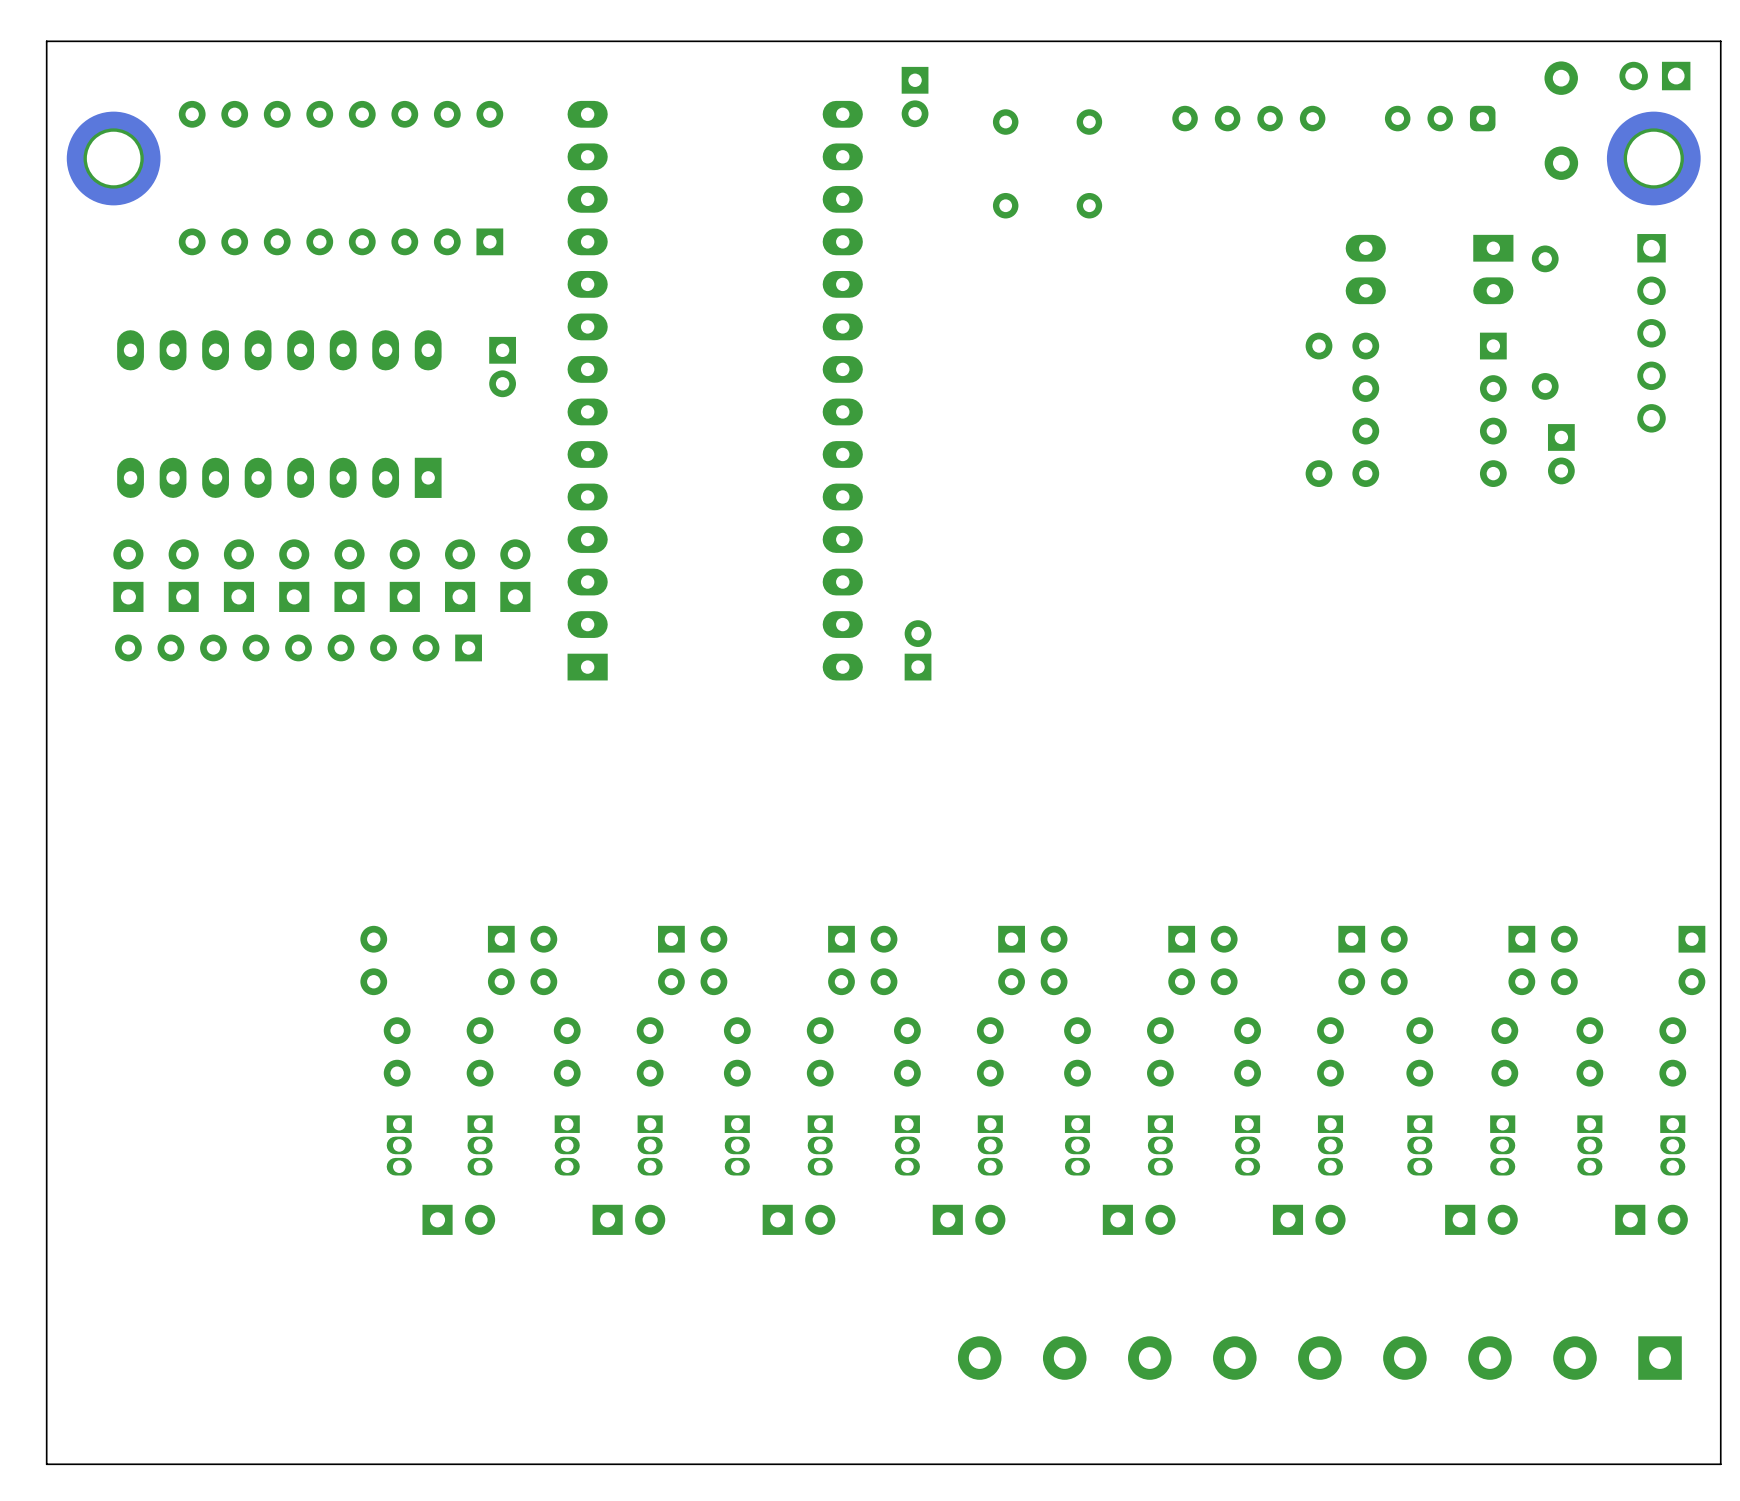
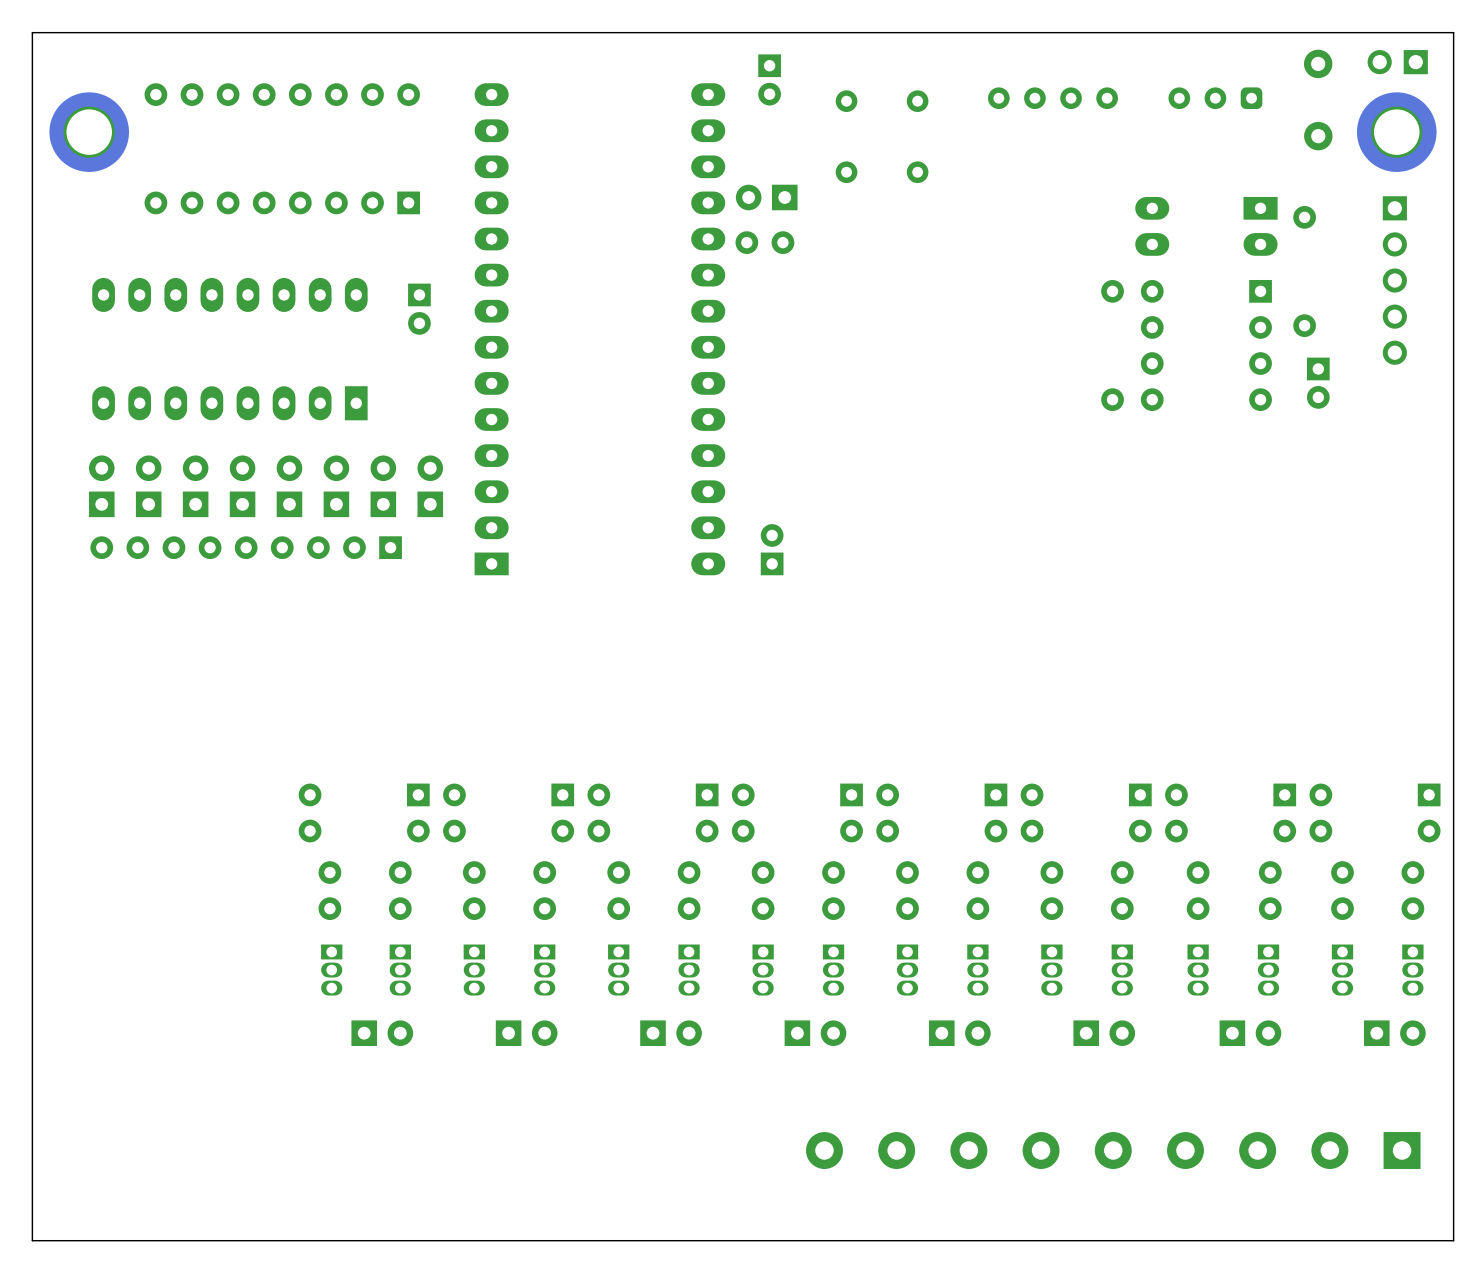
part: none -> (766, 197)
part: none -> (764, 242)

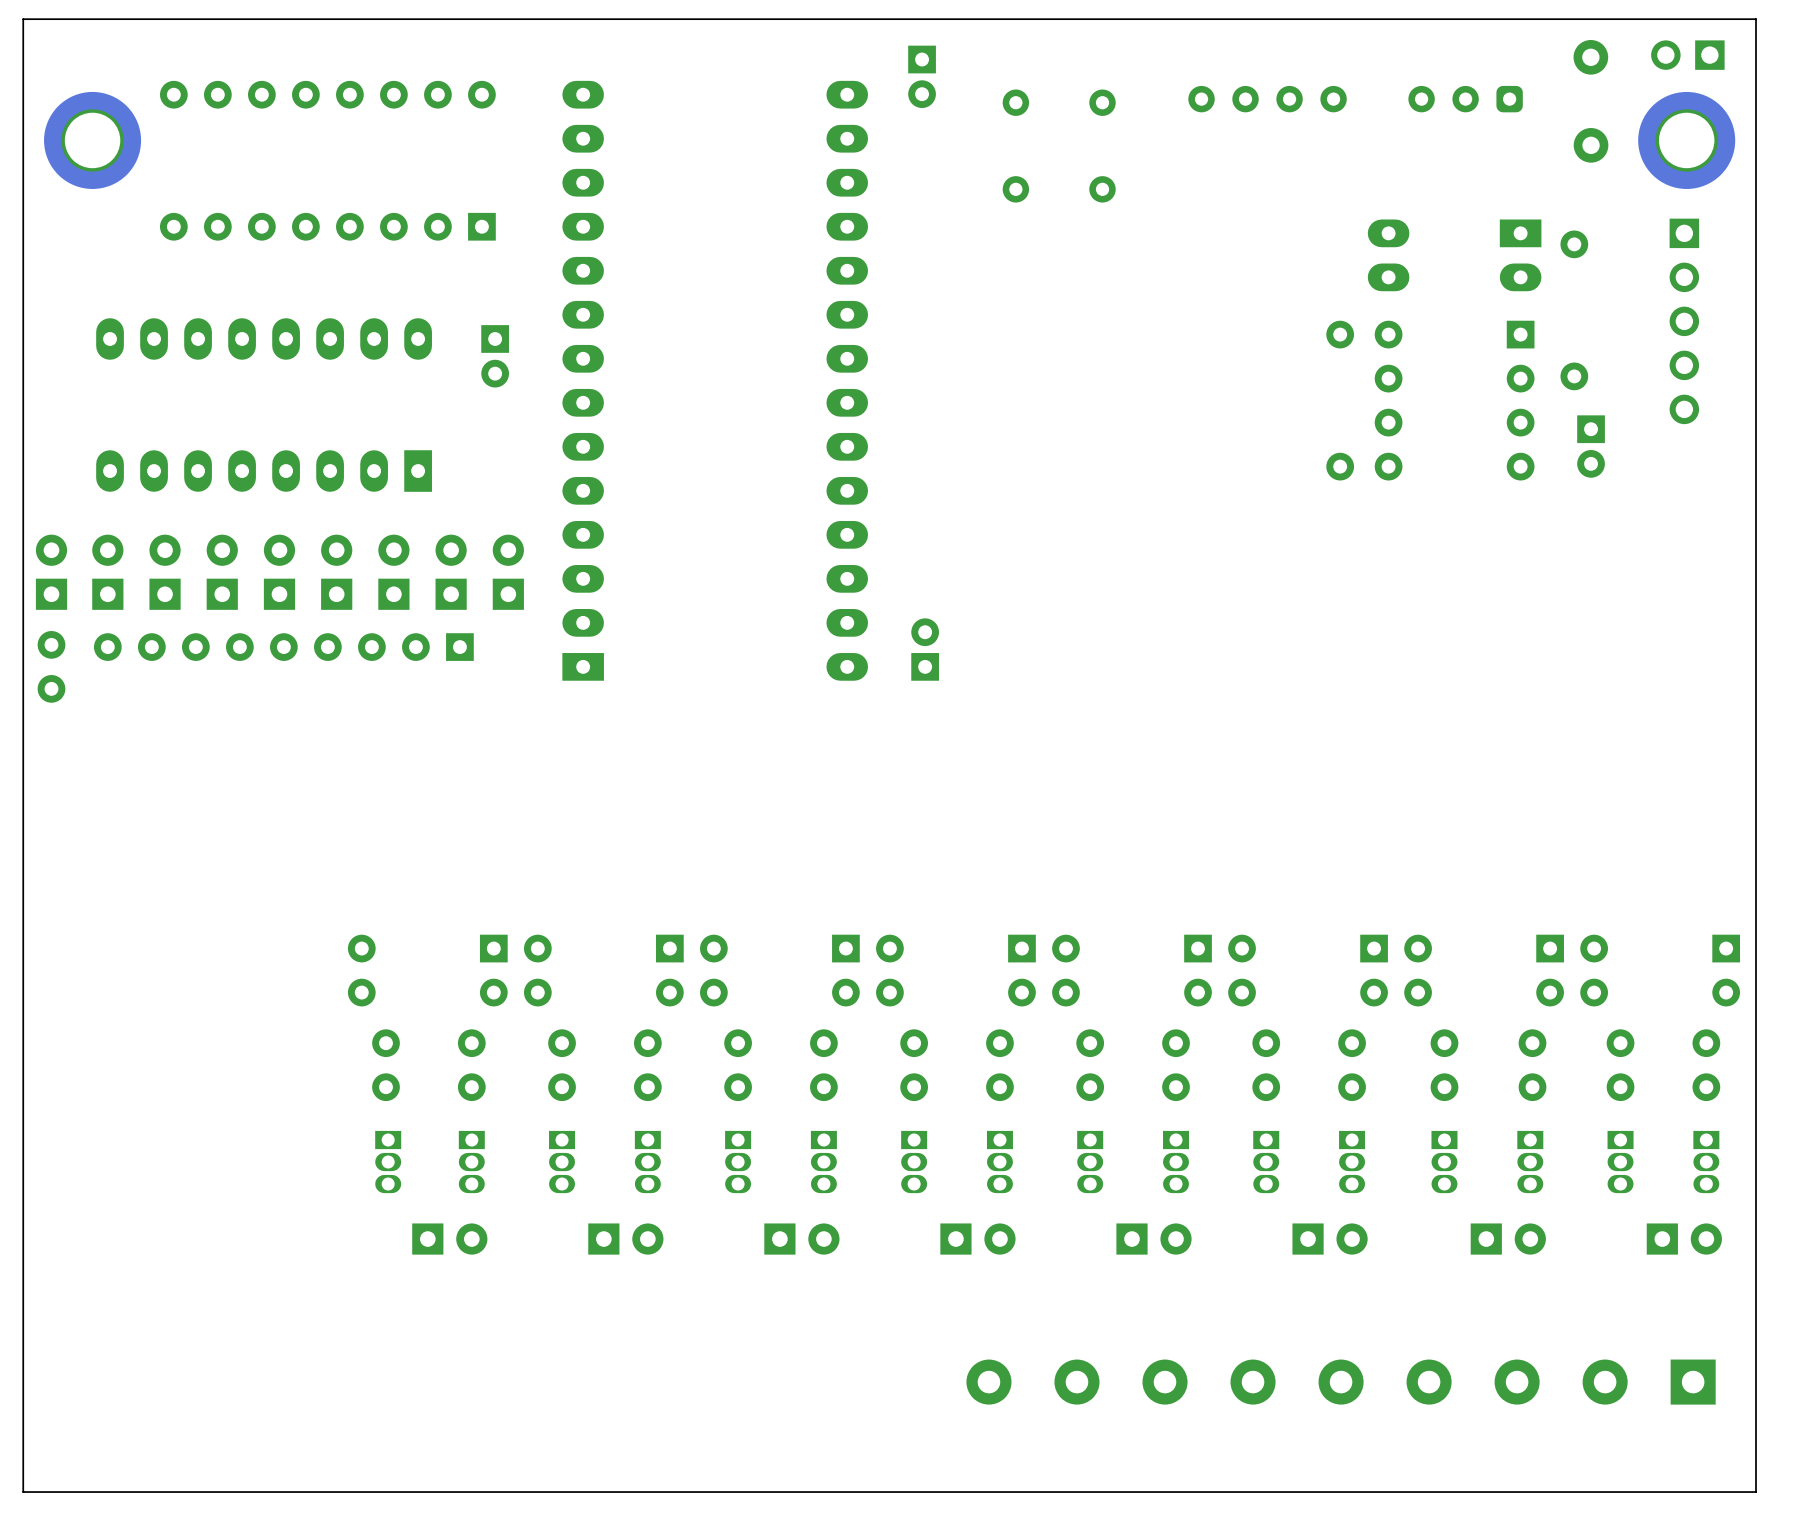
part: (766, 197) -> none
part: (764, 242) -> none
part: none -> (51, 572)
part: none -> (51, 666)

